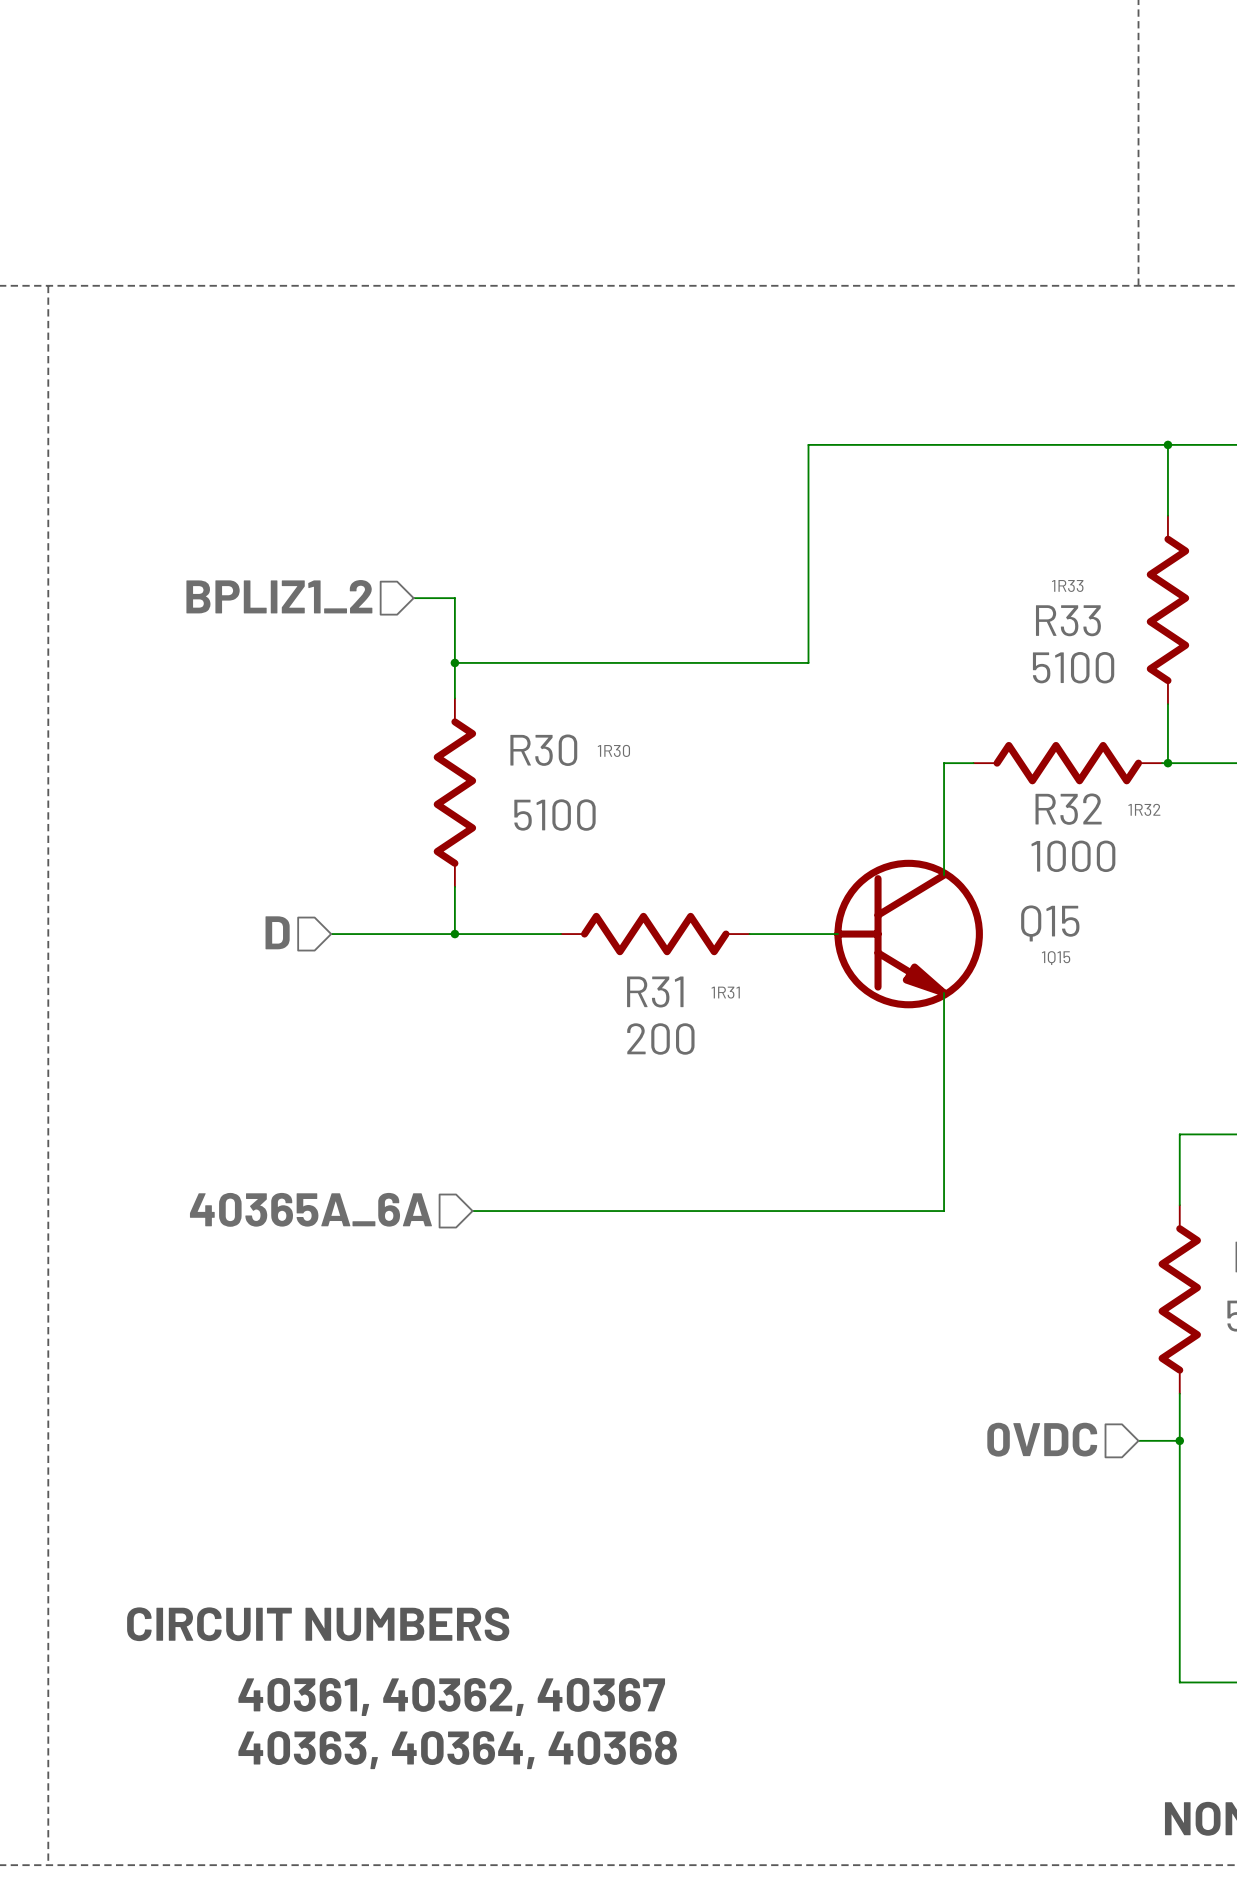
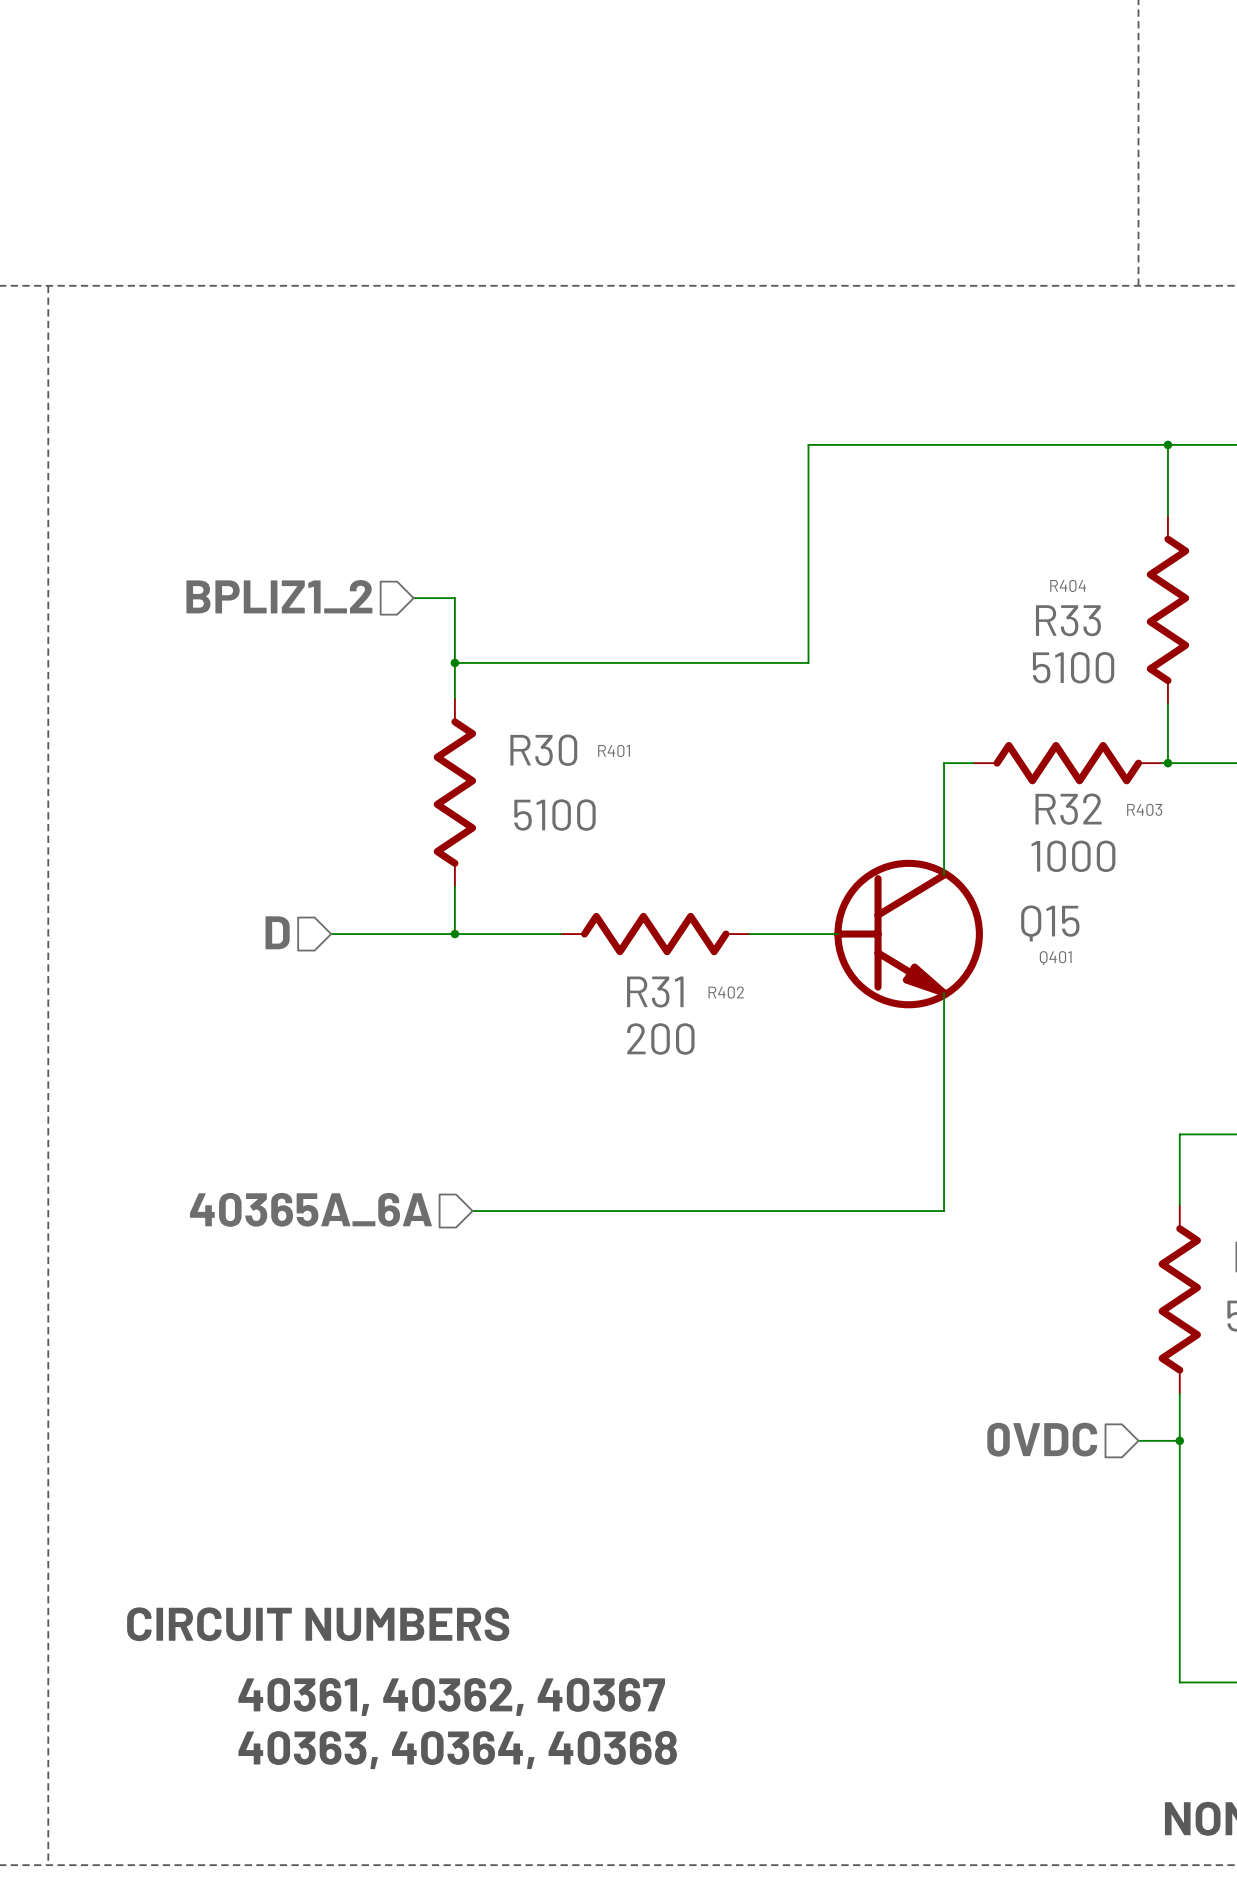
1R33 name: 1R33 (1067, 585) -> R404 (1068, 585)
1R30 name: 1R30 (613, 750) -> R401 (614, 750)
1R32 name: 1R32 (1144, 809) -> R403 (1144, 809)
1Q15 name: 1Q15 (1056, 958) -> Q401 (1055, 958)
1R31 name: 1R31 (725, 992) -> R402 (726, 992)

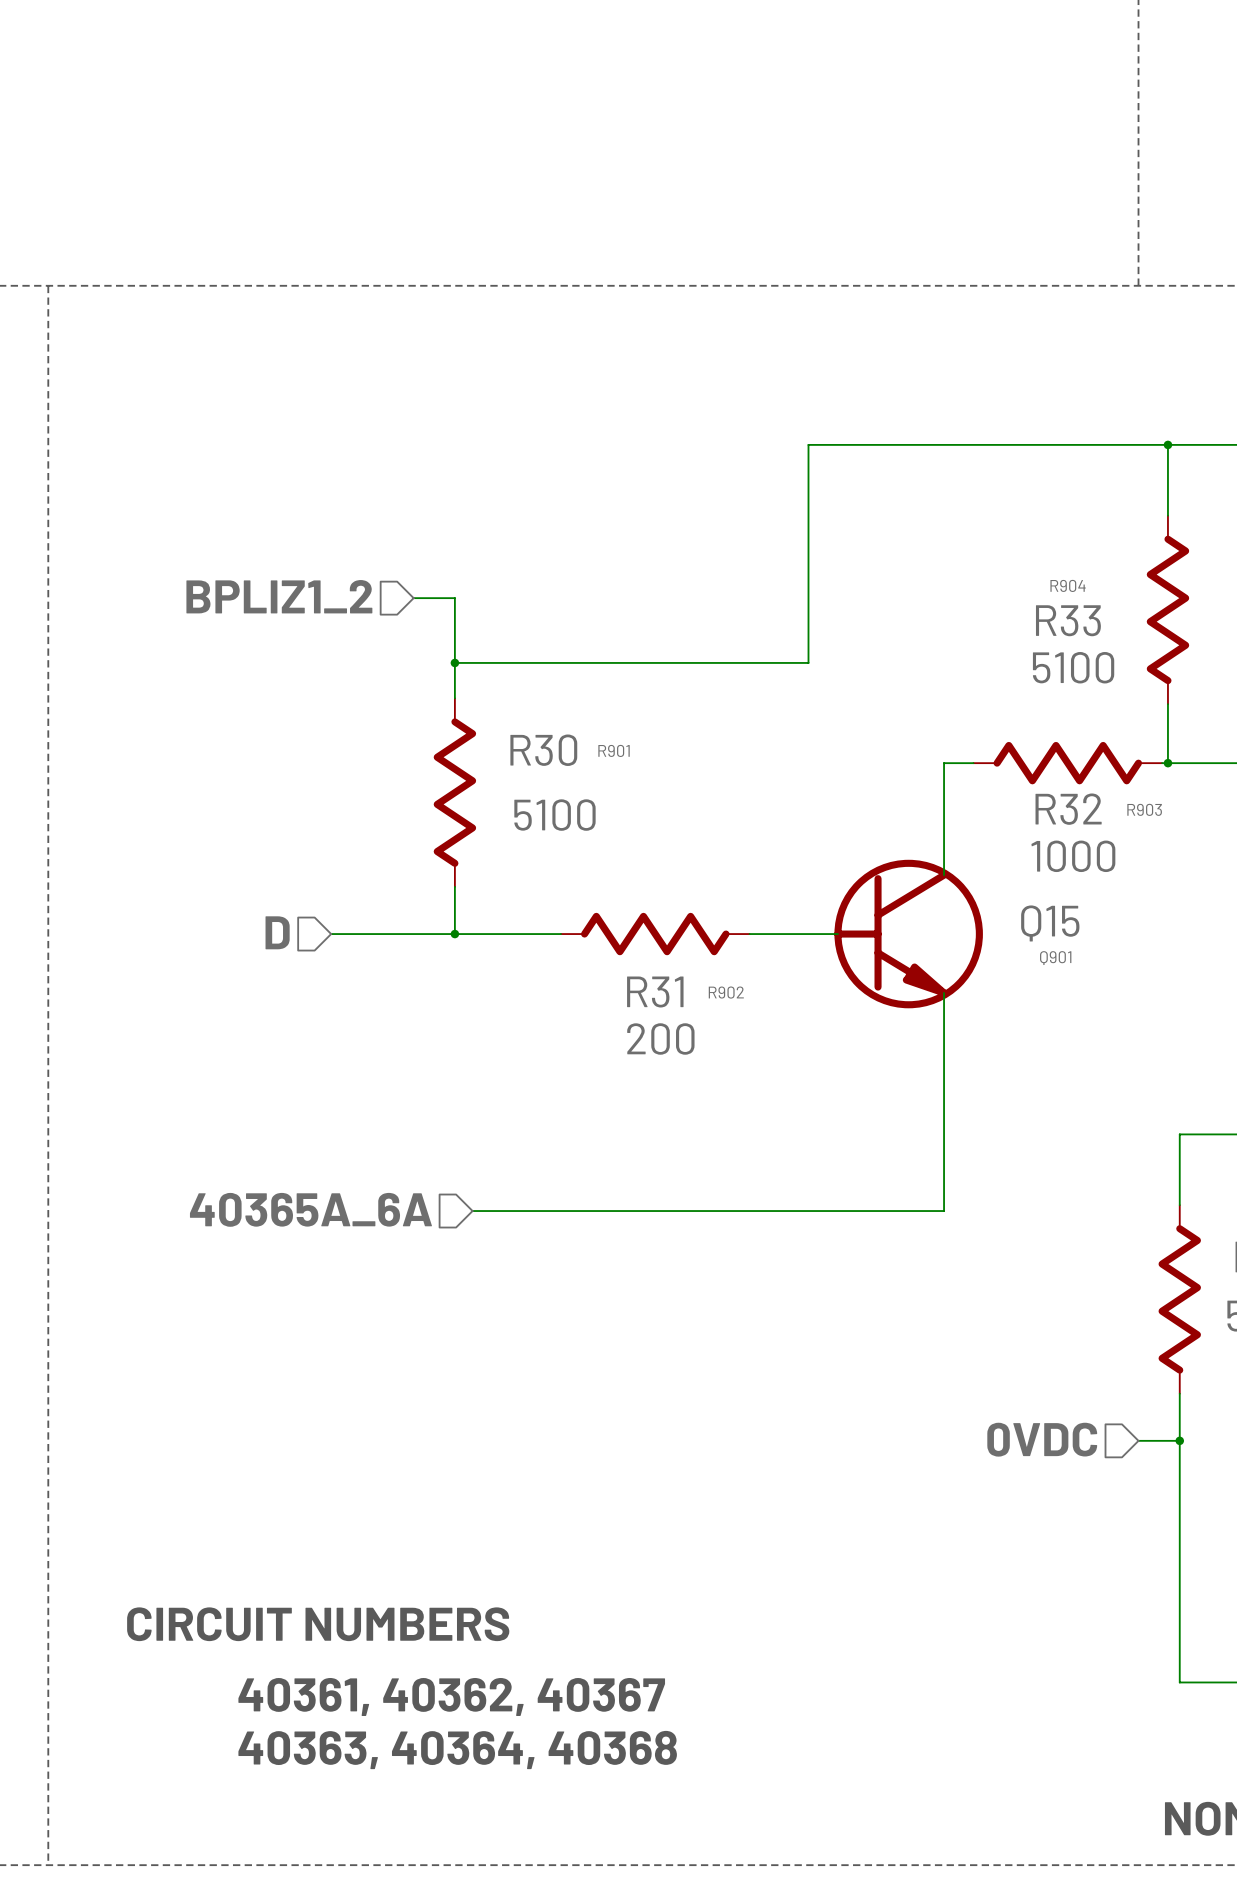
R404 name: R404 (1068, 585) -> R904 (1068, 585)
R401 name: R401 (614, 750) -> R901 (614, 750)
R403 name: R403 (1144, 809) -> R903 (1144, 809)
Q401 name: Q401 (1055, 958) -> Q901 (1055, 958)
R402 name: R402 (726, 992) -> R902 (726, 992)

